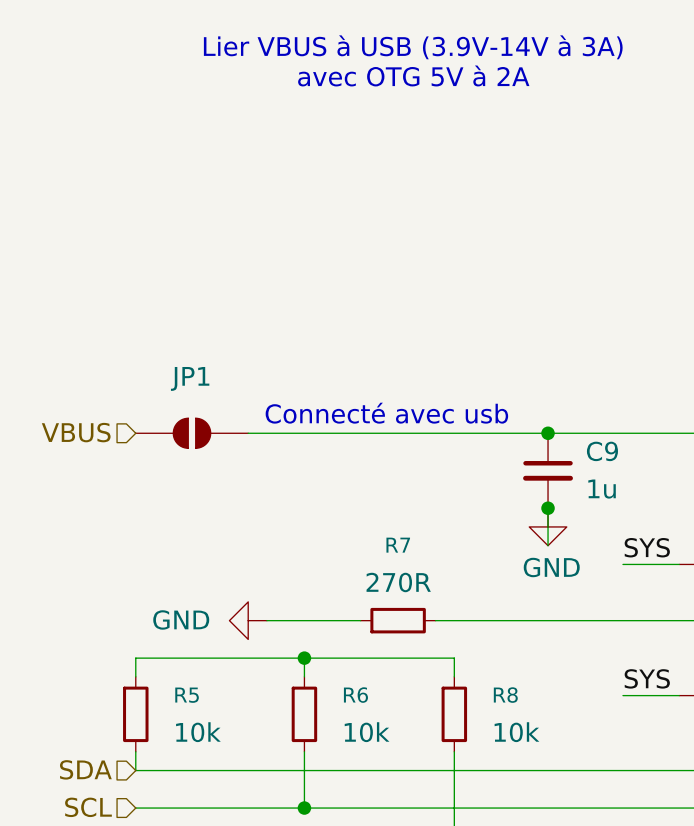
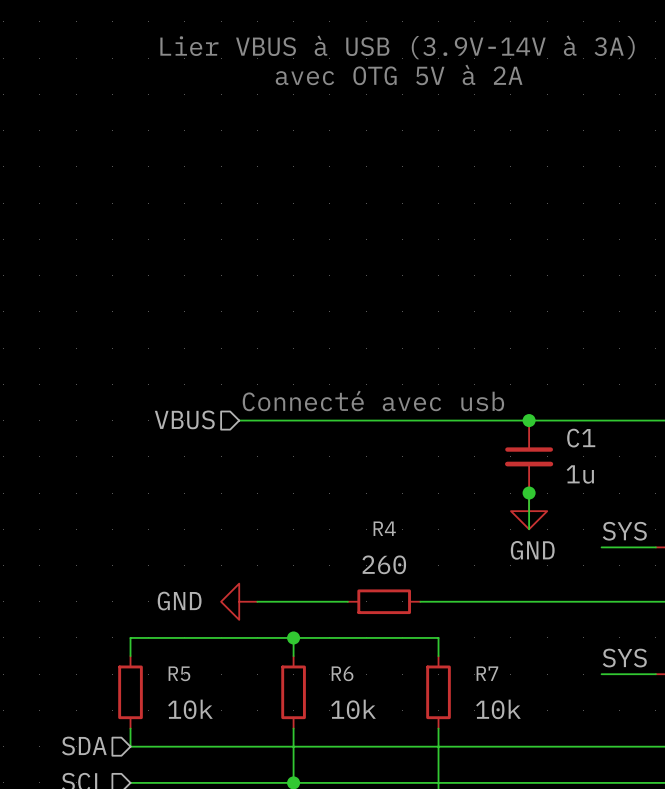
hierarchical label position: VBUS (76, 432) -> VBUS (184, 419)
JP1: (191, 433) -> none
C9 name: C9 (602, 451) -> C1 (581, 438)
R7 name: R7 (398, 545) -> R4 (384, 528)
R7 value: 270R (398, 582) -> 260 (384, 564)
R8 name: R8 (505, 695) -> R7 (487, 673)

